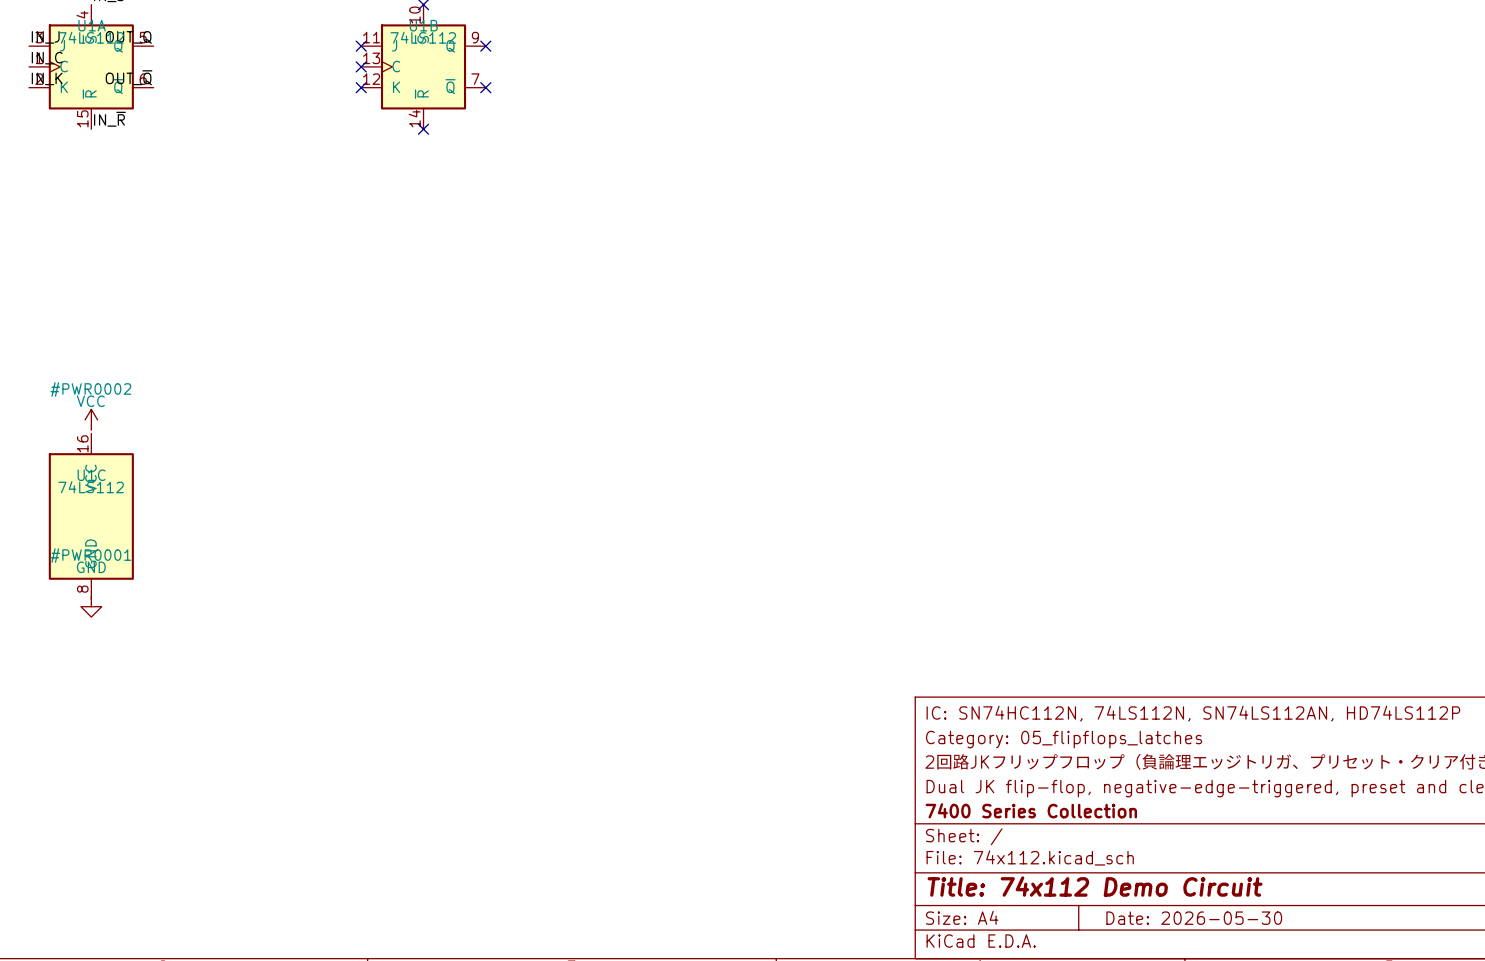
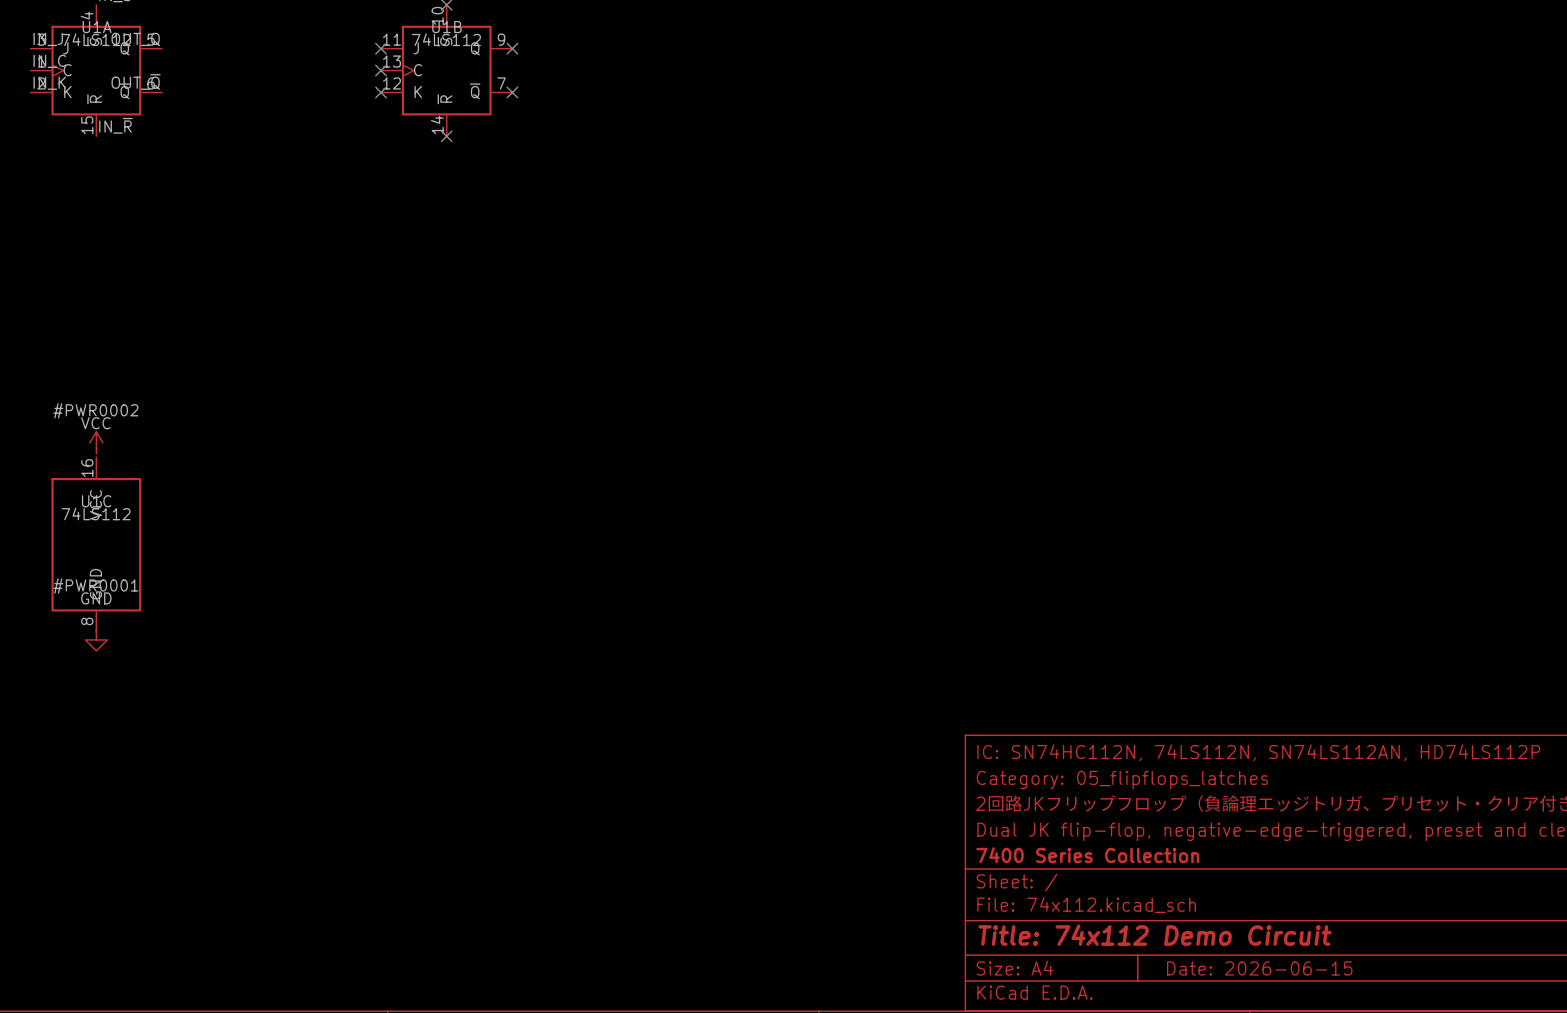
title block: Date: 2026-05-30 (1194, 918) -> Date: 2026-06-15 (1259, 968)

